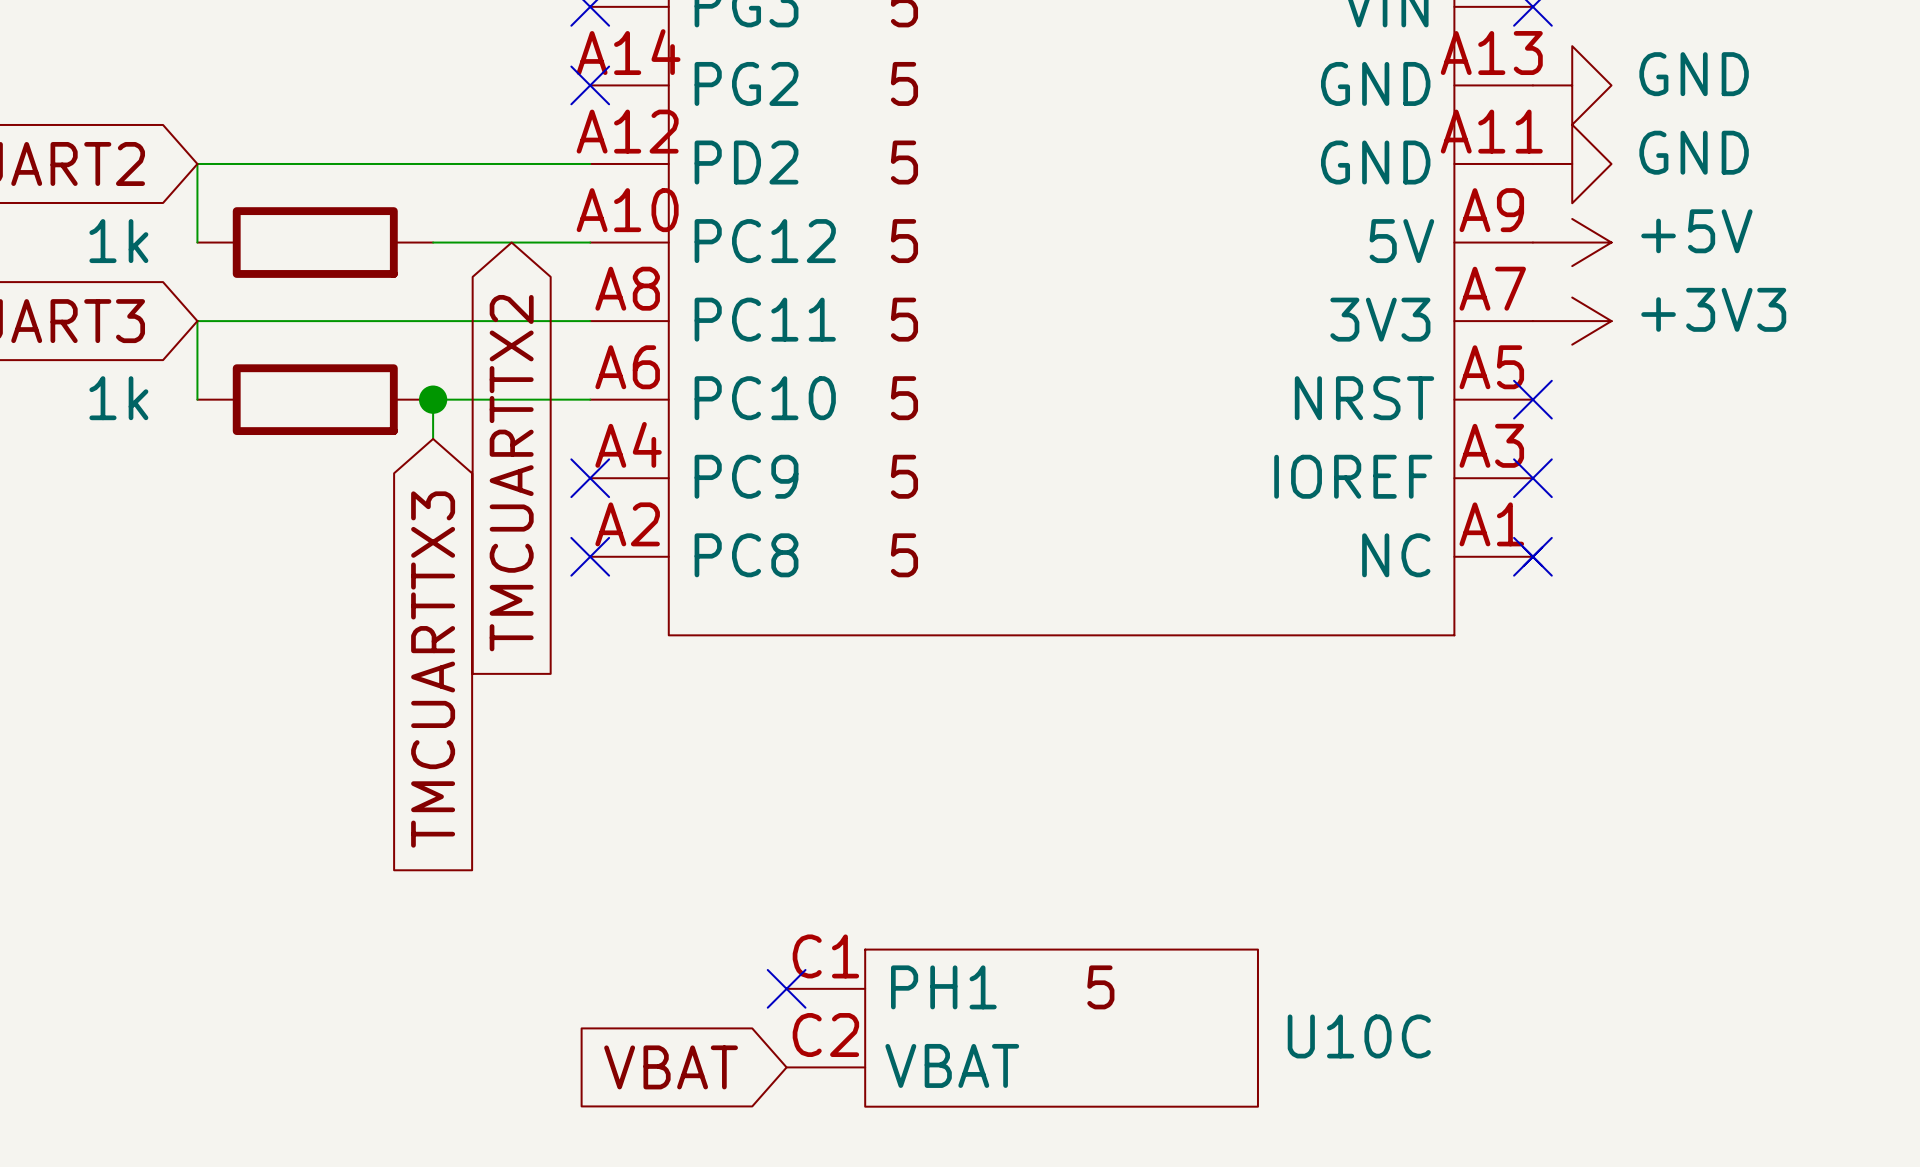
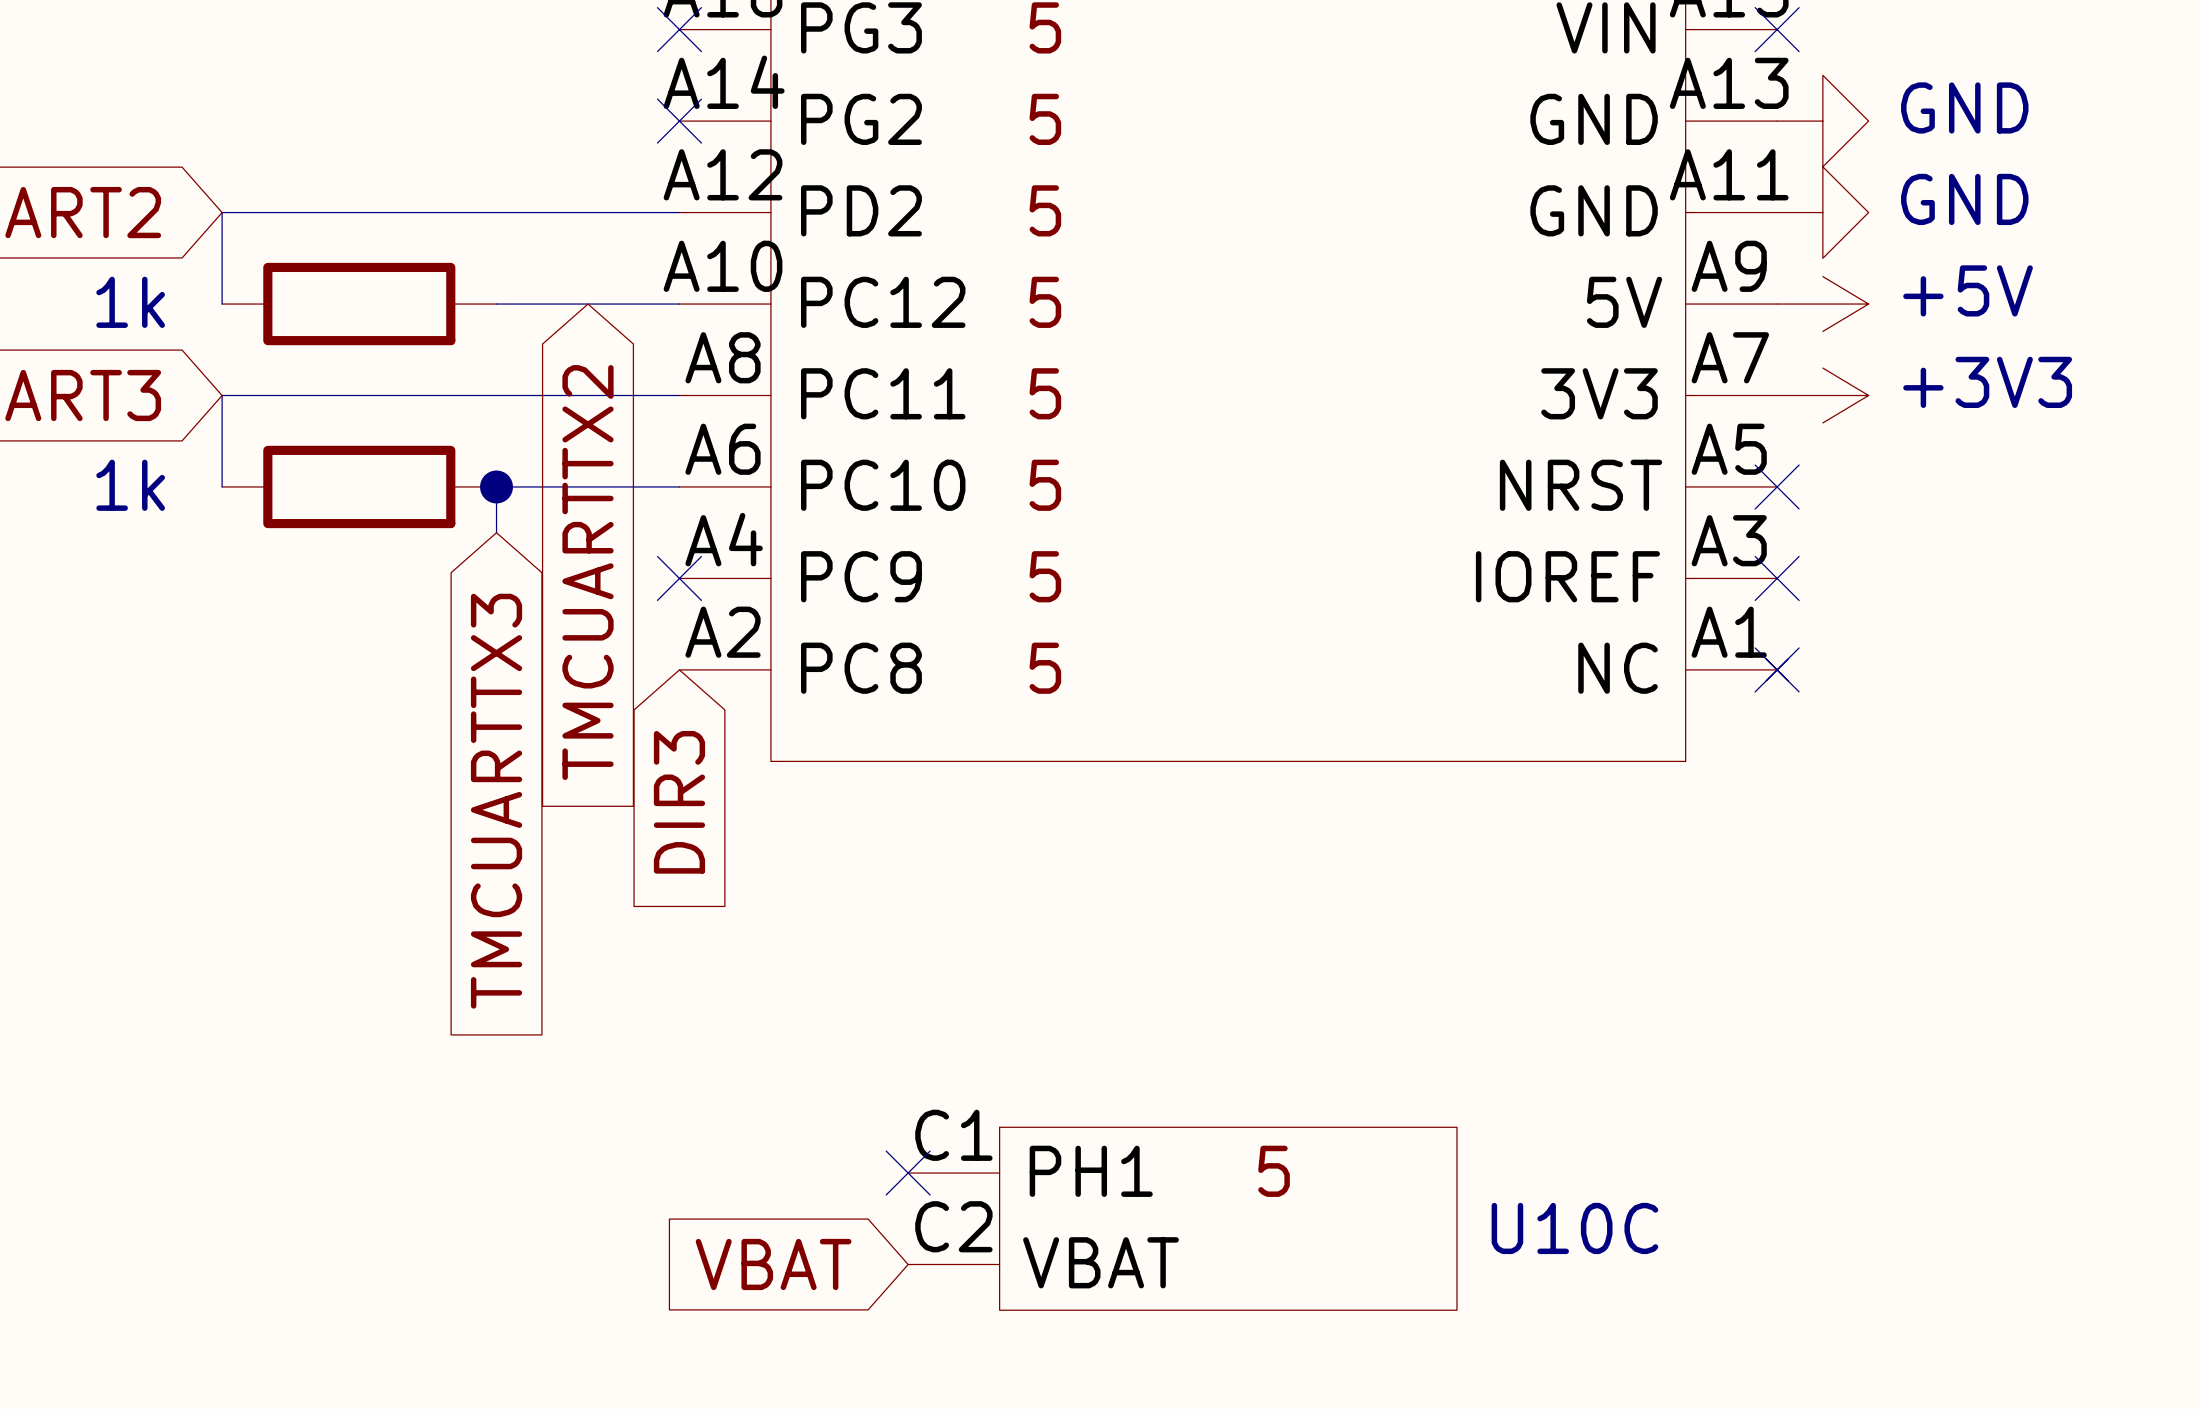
no-connect mark: (590, 556) -> none
global label: none -> DIR3 (679, 802)

